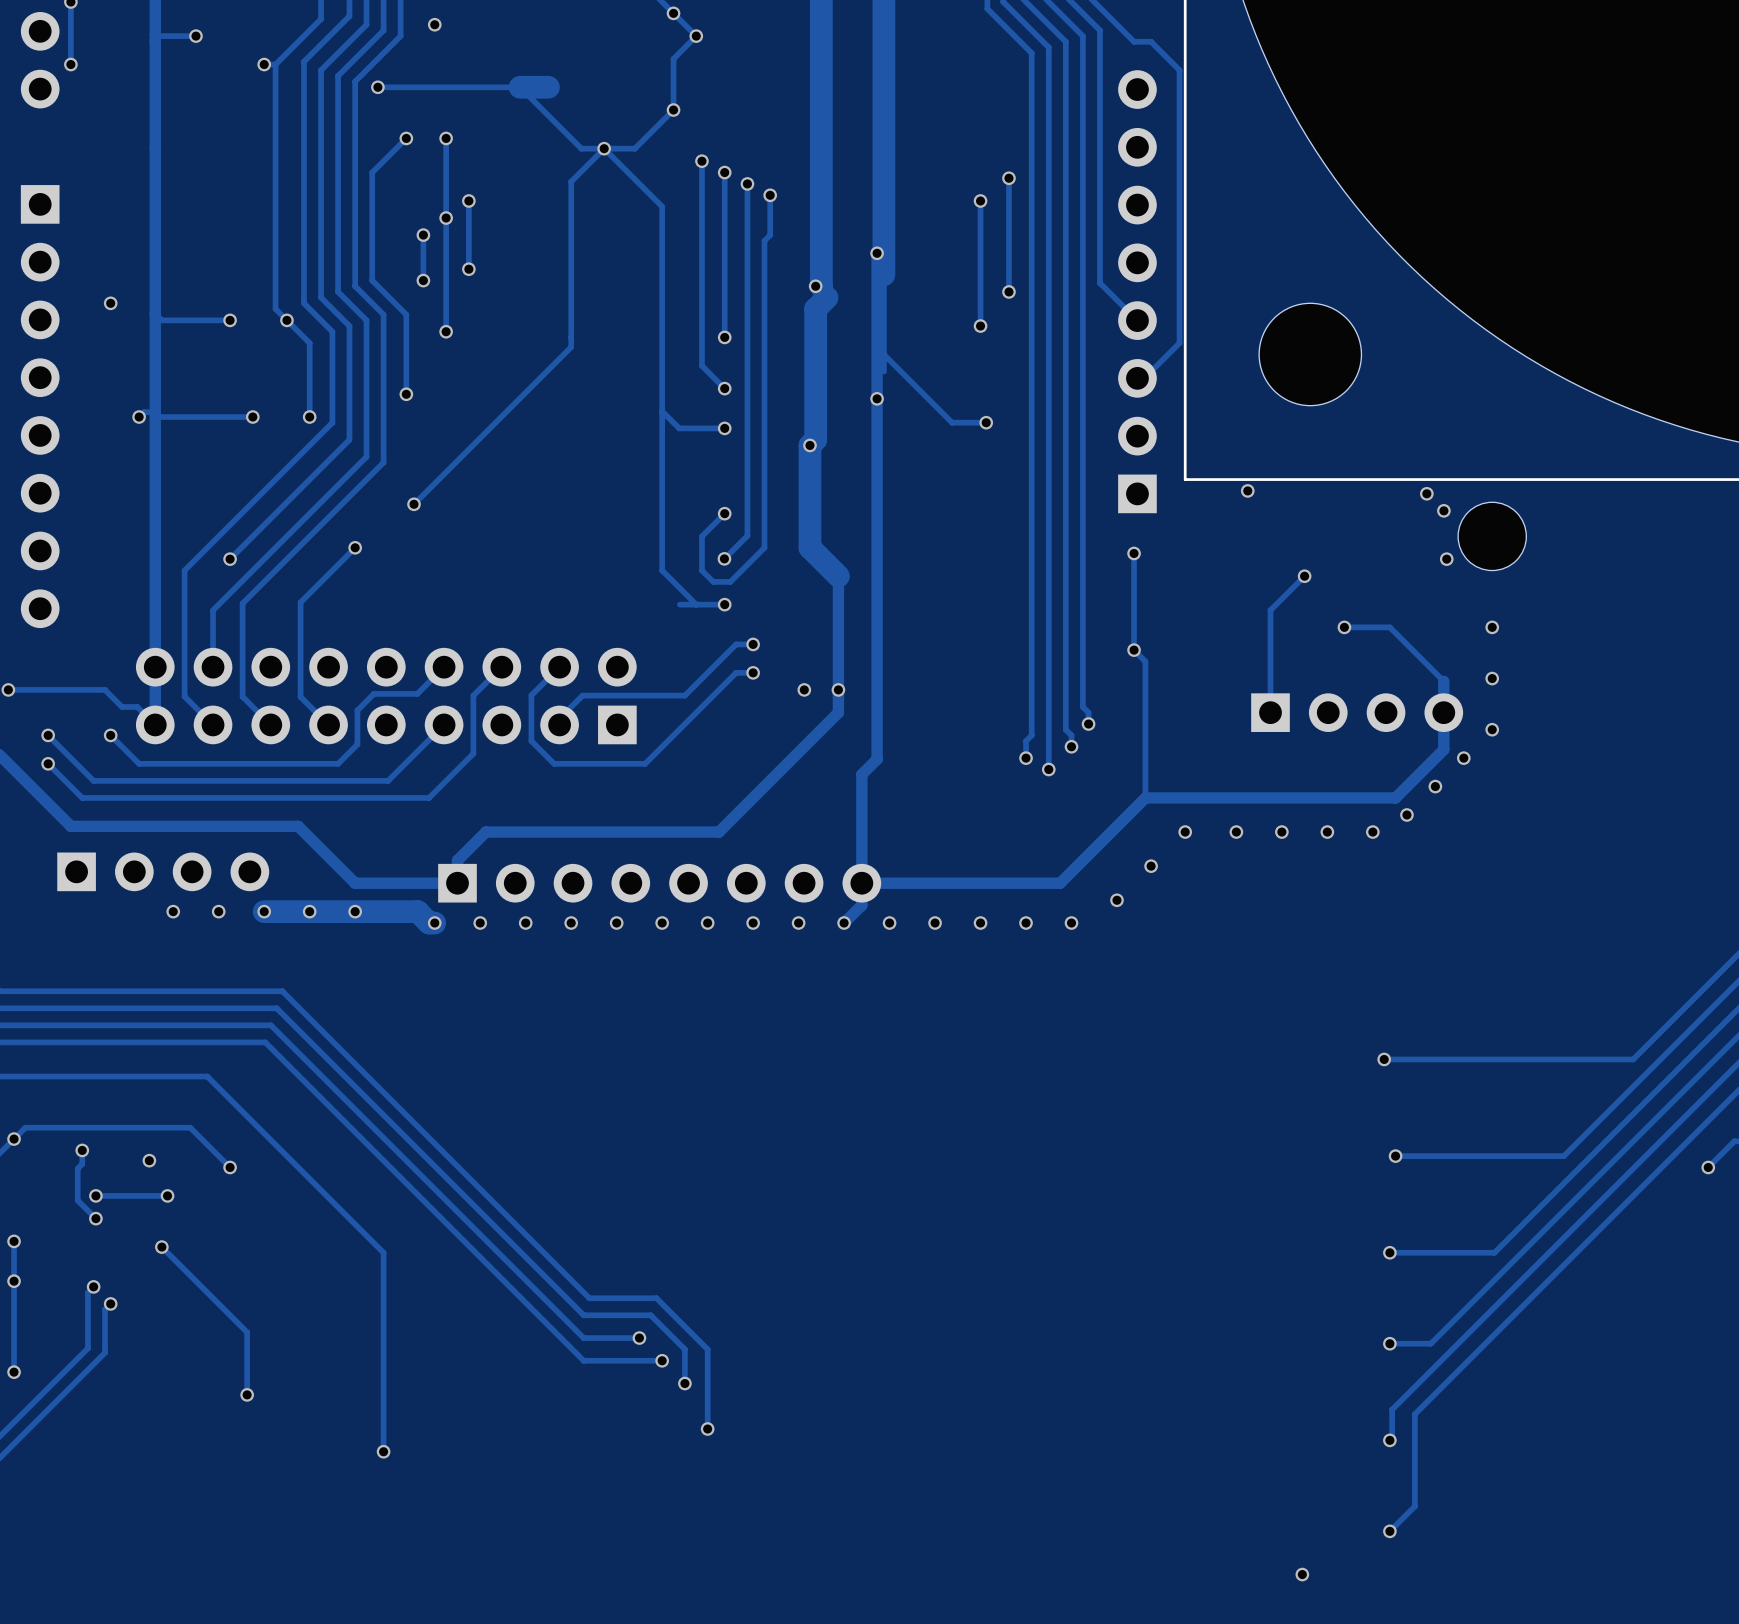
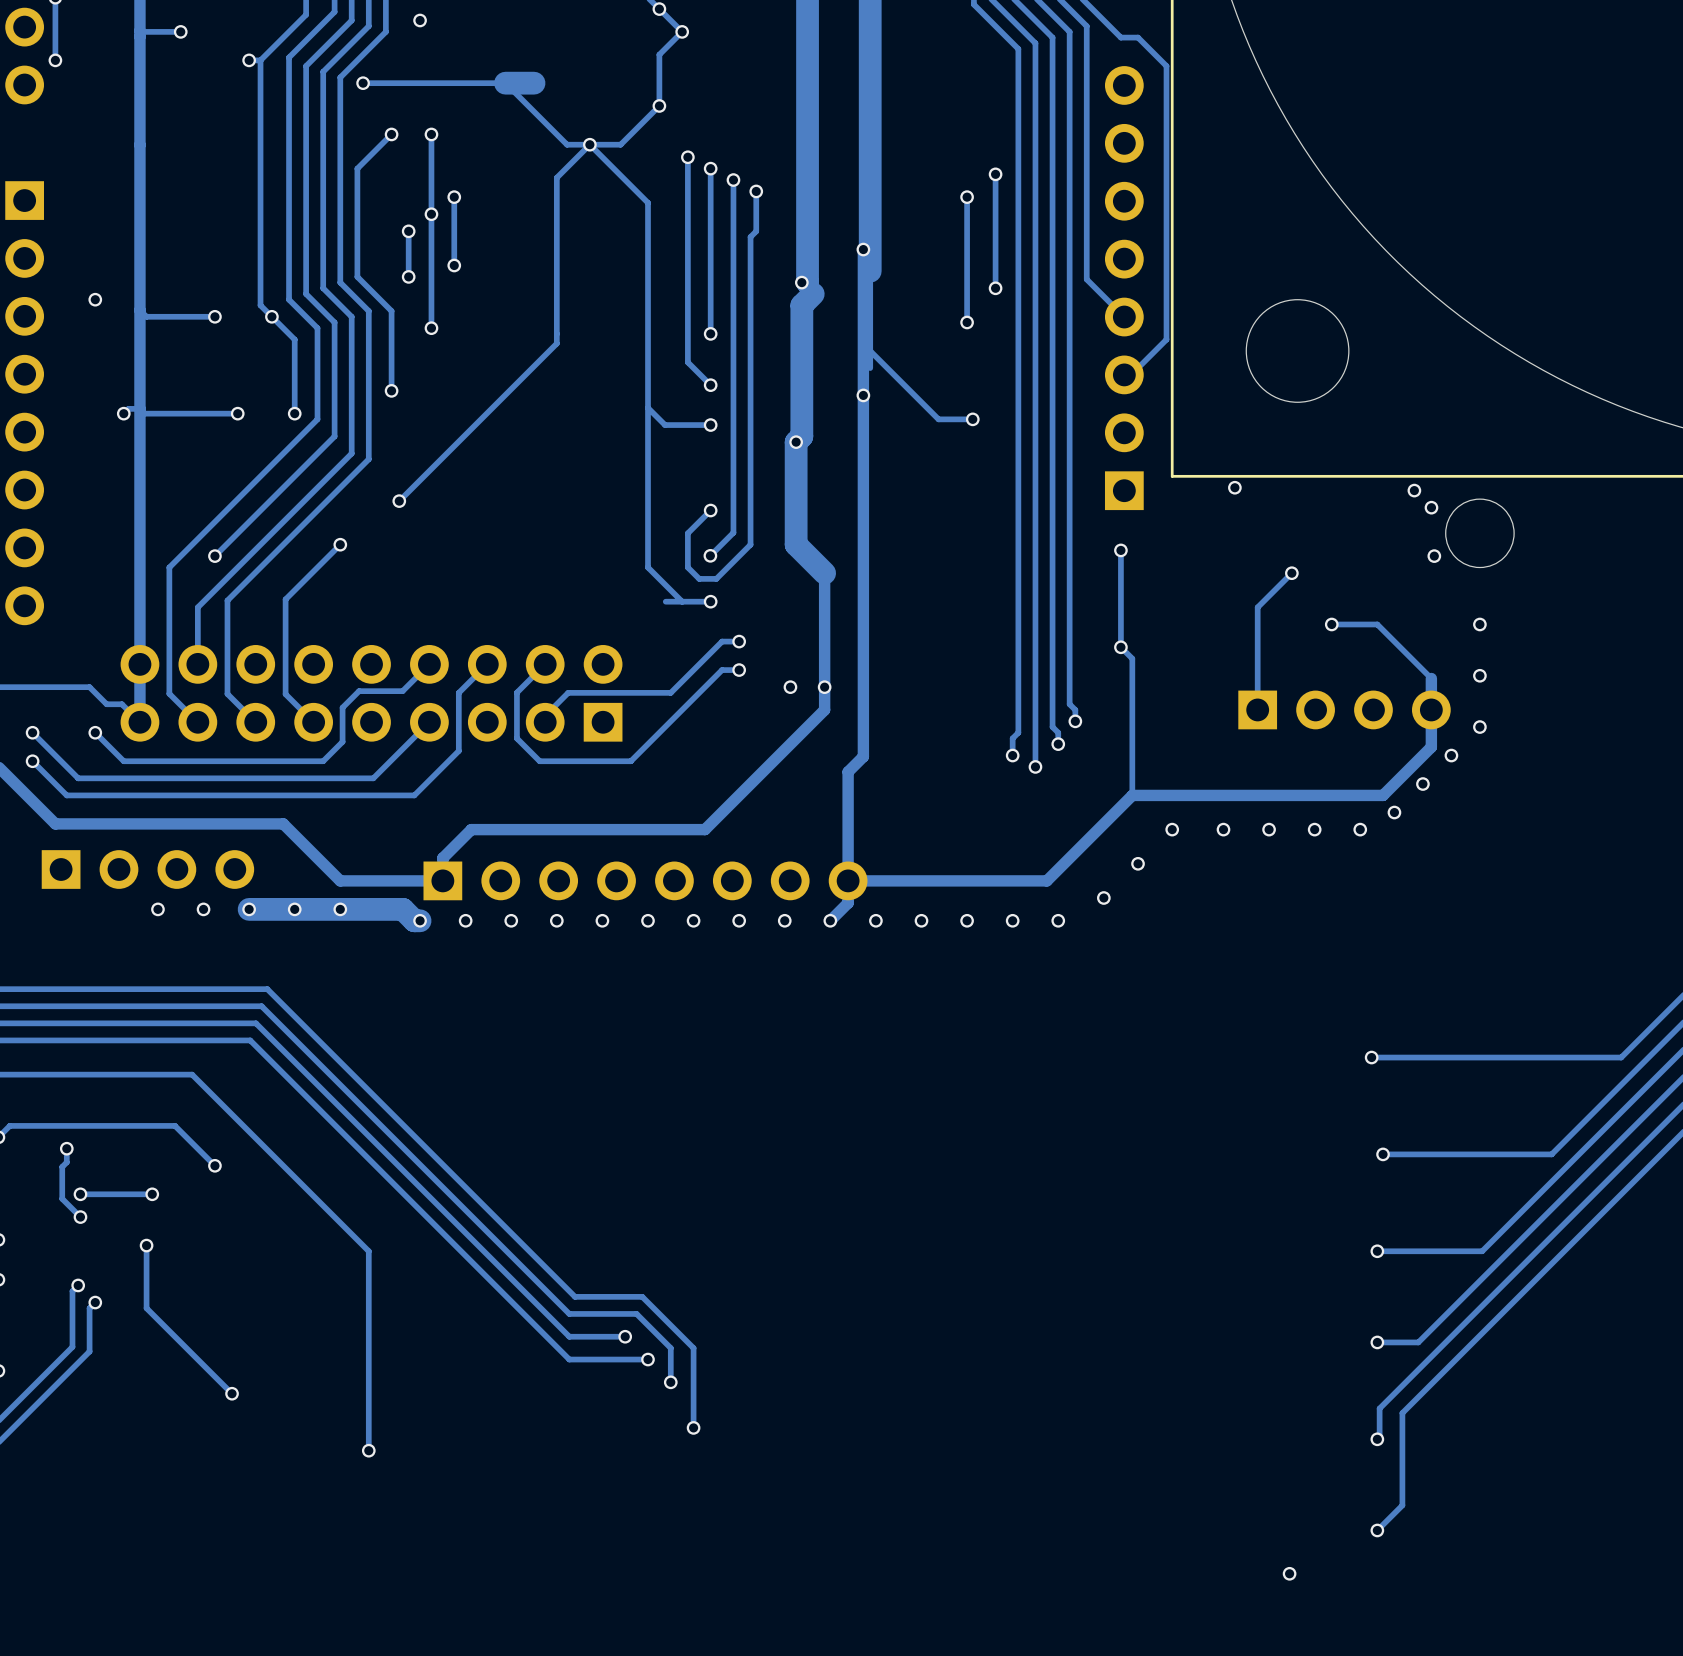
via: (149, 1160) -> none
track: (161, 1247) (247, 1332) (247, 1394) -> (146, 1245) (146, 1308) (232, 1393)

